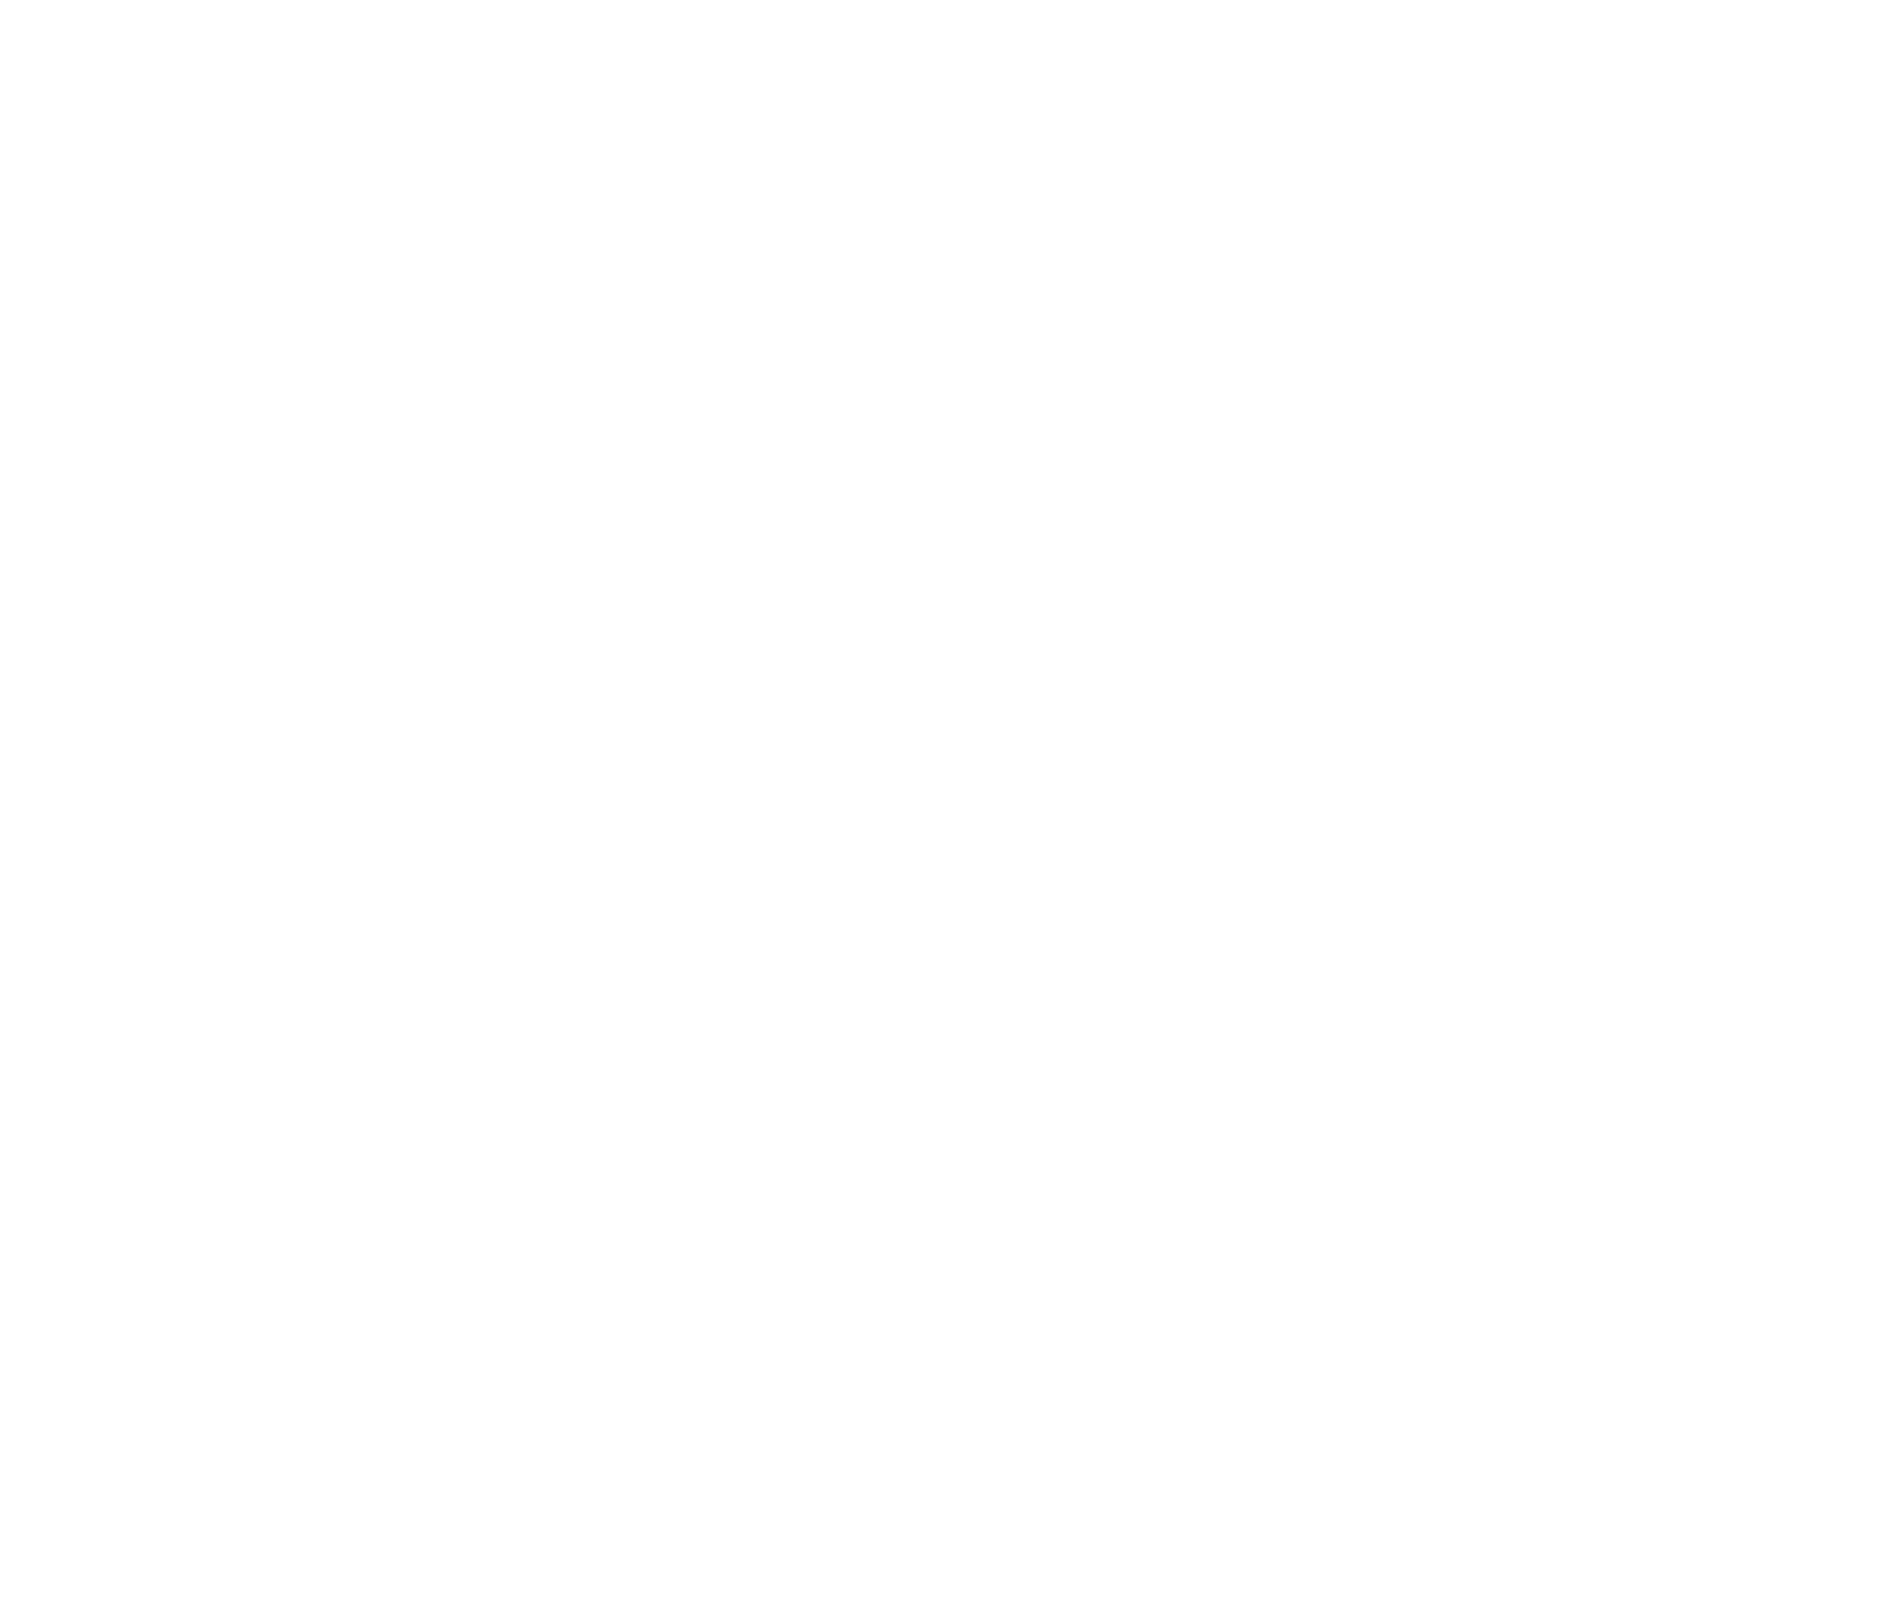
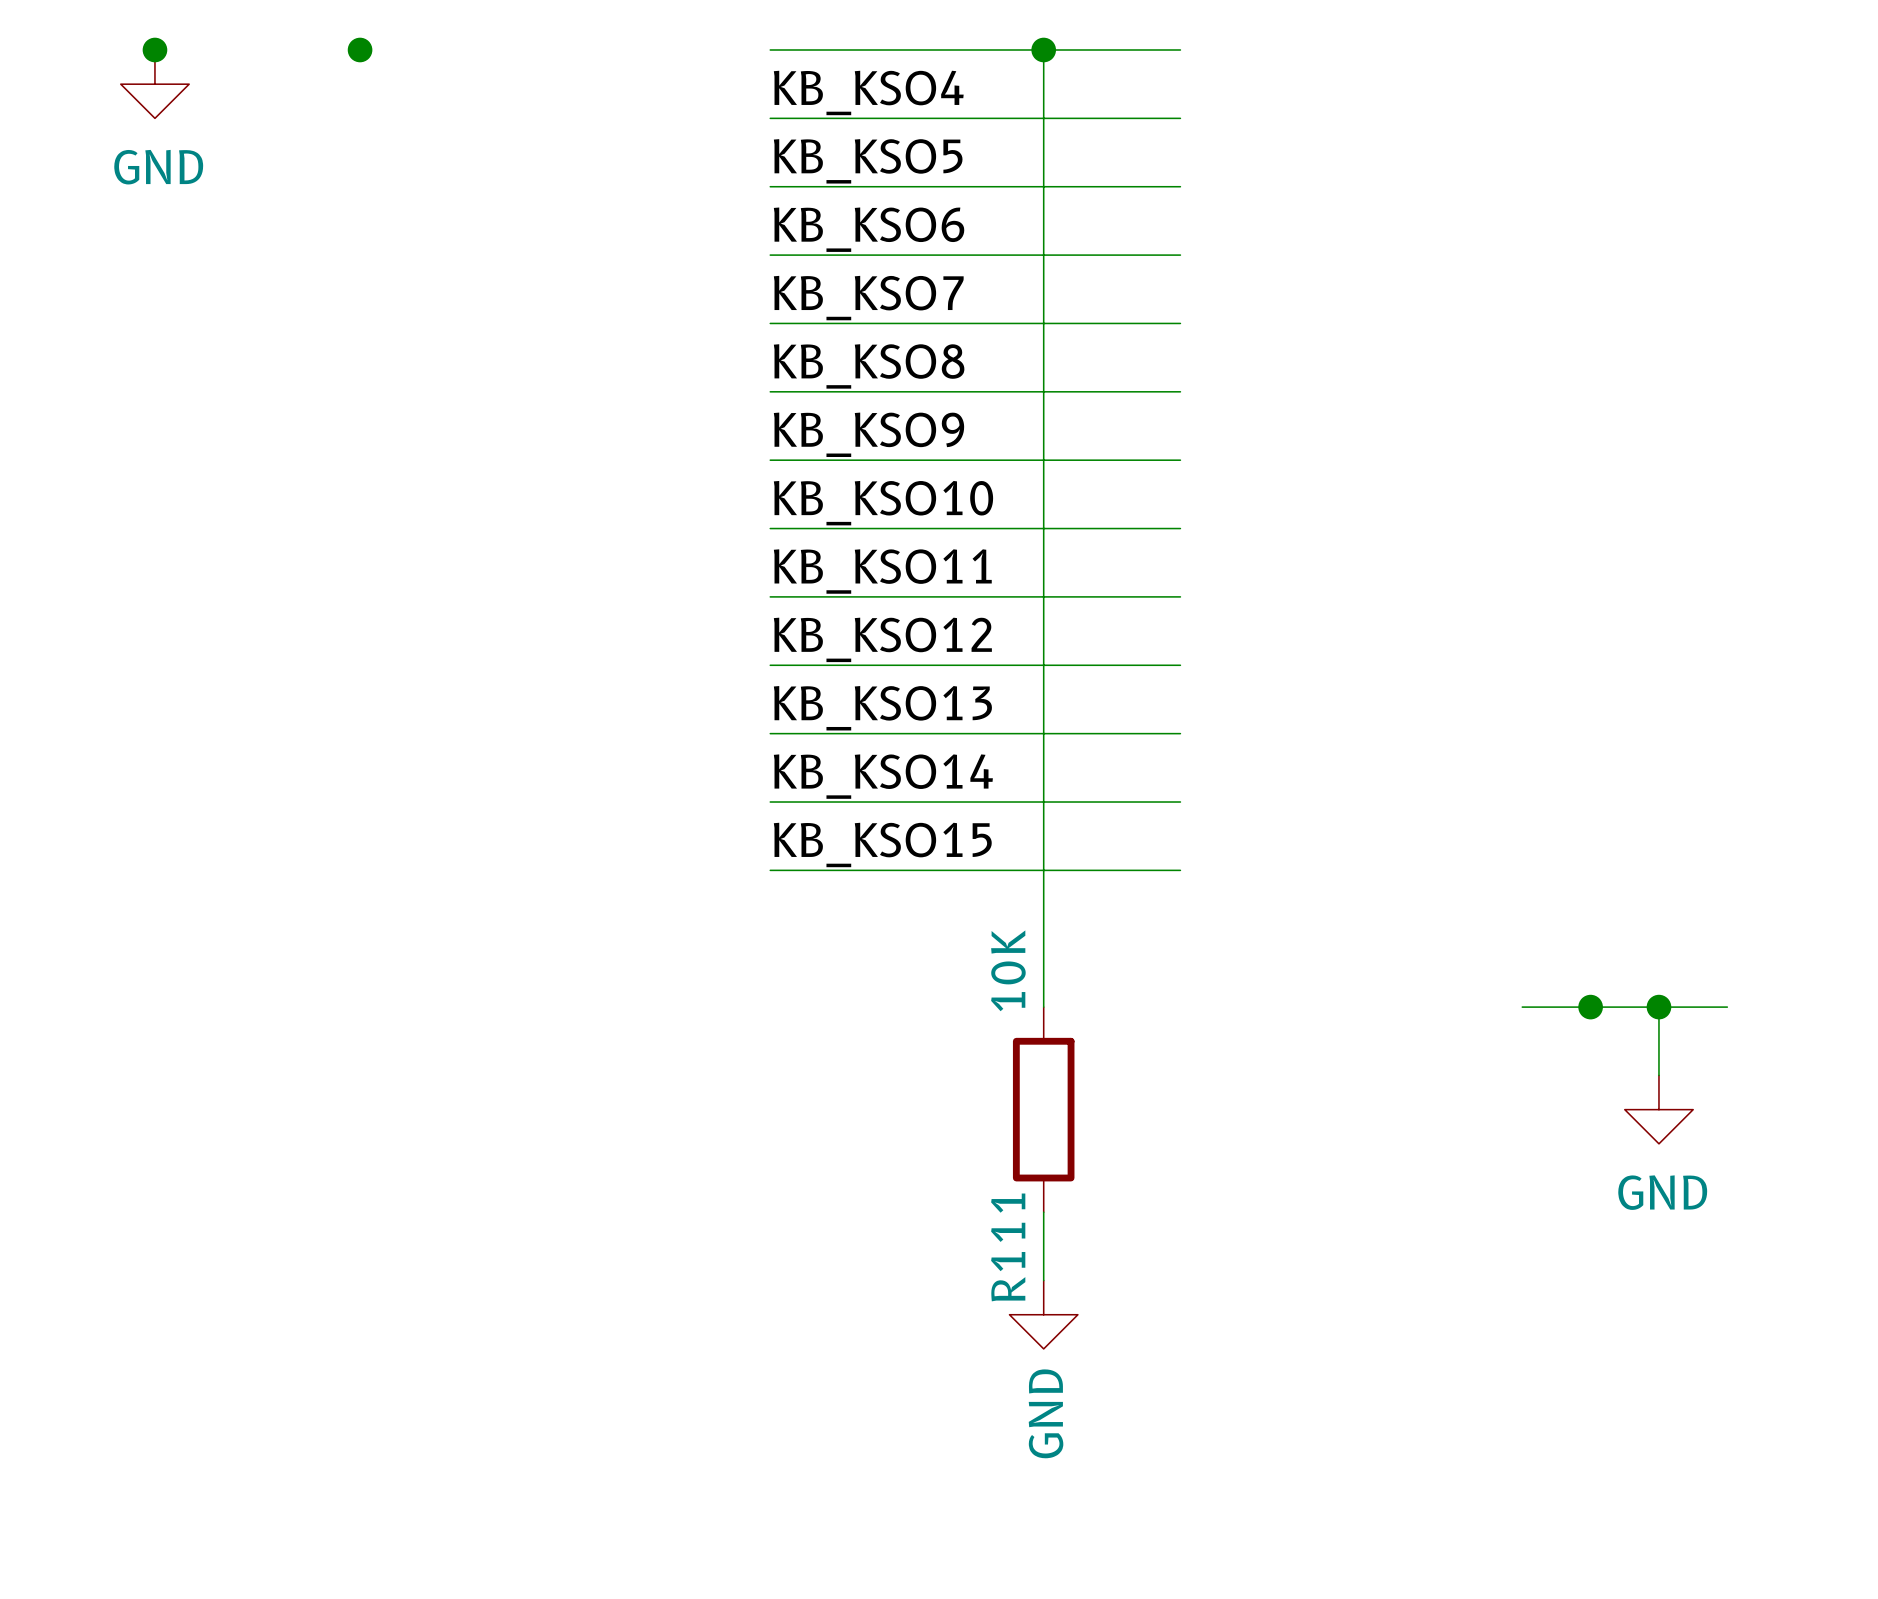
junction: none -> (154, 50)
junction: none -> (360, 50)
wire: none -> (770, 50) (1180, 50)
wire: none -> (1043, 50) (1043, 1007)
junction: none -> (1043, 50)
power symbol: none -> GND (154, 84)
label: none -> KB_KSO4 (868, 92)
wire: none -> (770, 118) (1180, 118)
label: none -> KB_KSO5 (868, 161)
wire: none -> (770, 186) (1180, 186)
label: none -> KB_KSO6 (869, 229)
wire: none -> (770, 255) (1180, 255)
label: none -> KB_KSO7 (868, 298)
wire: none -> (770, 323) (1180, 323)
label: none -> KB_KSO8 (869, 366)
wire: none -> (770, 391) (1180, 391)
label: none -> KB_KSO9 (868, 434)
wire: none -> (770, 460) (1180, 460)
label: none -> KB_KSO10 (883, 503)
wire: none -> (770, 528) (1180, 528)
label: none -> KB_KSO11 (882, 571)
wire: none -> (770, 596) (1180, 596)
label: none -> KB_KSO12 (882, 639)
wire: none -> (770, 665) (1180, 665)
label: none -> KB_KSO13 (882, 708)
wire: none -> (770, 733) (1180, 733)
label: none -> KB_KSO14 (883, 776)
wire: none -> (770, 802) (1180, 802)
label: none -> KB_KSO15 (882, 844)
wire: none -> (770, 870) (1180, 870)
wire: none -> (1522, 1007) (1727, 1007)
junction: none -> (1590, 1007)
wire: none -> (1658, 1007) (1658, 1075)
junction: none -> (1658, 1007)
R111: none -> 10K (1043, 1109)
power symbol: none -> GND (1658, 1109)
wire: none -> (1043, 1212) (1043, 1280)
power symbol: none -> GND (1043, 1314)

